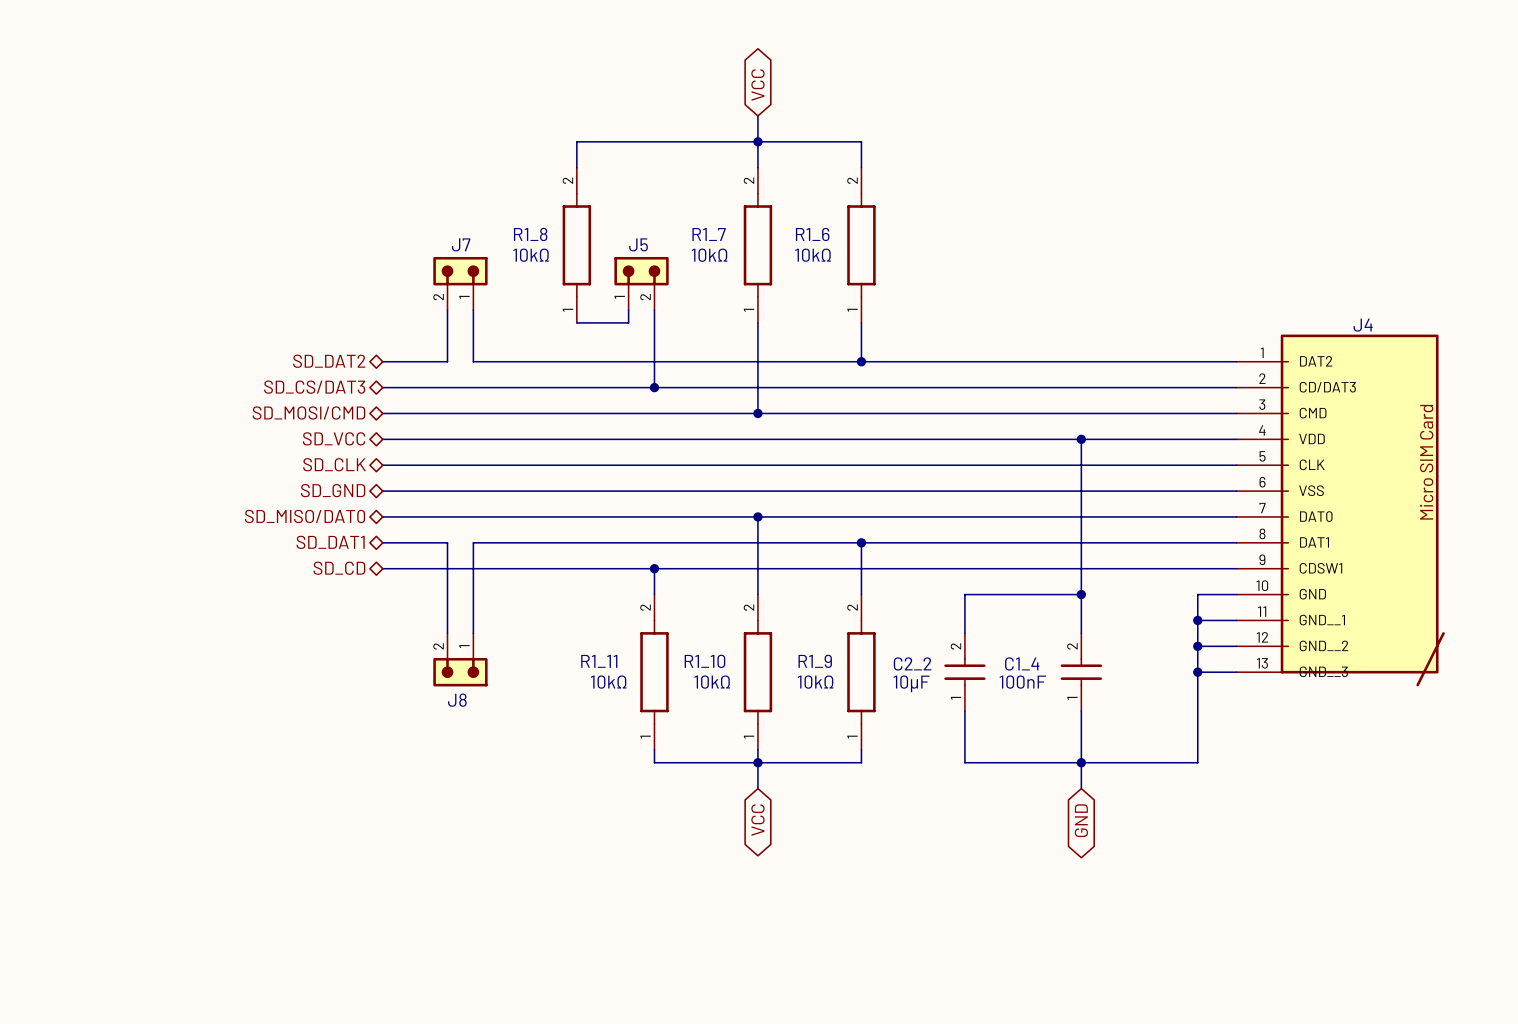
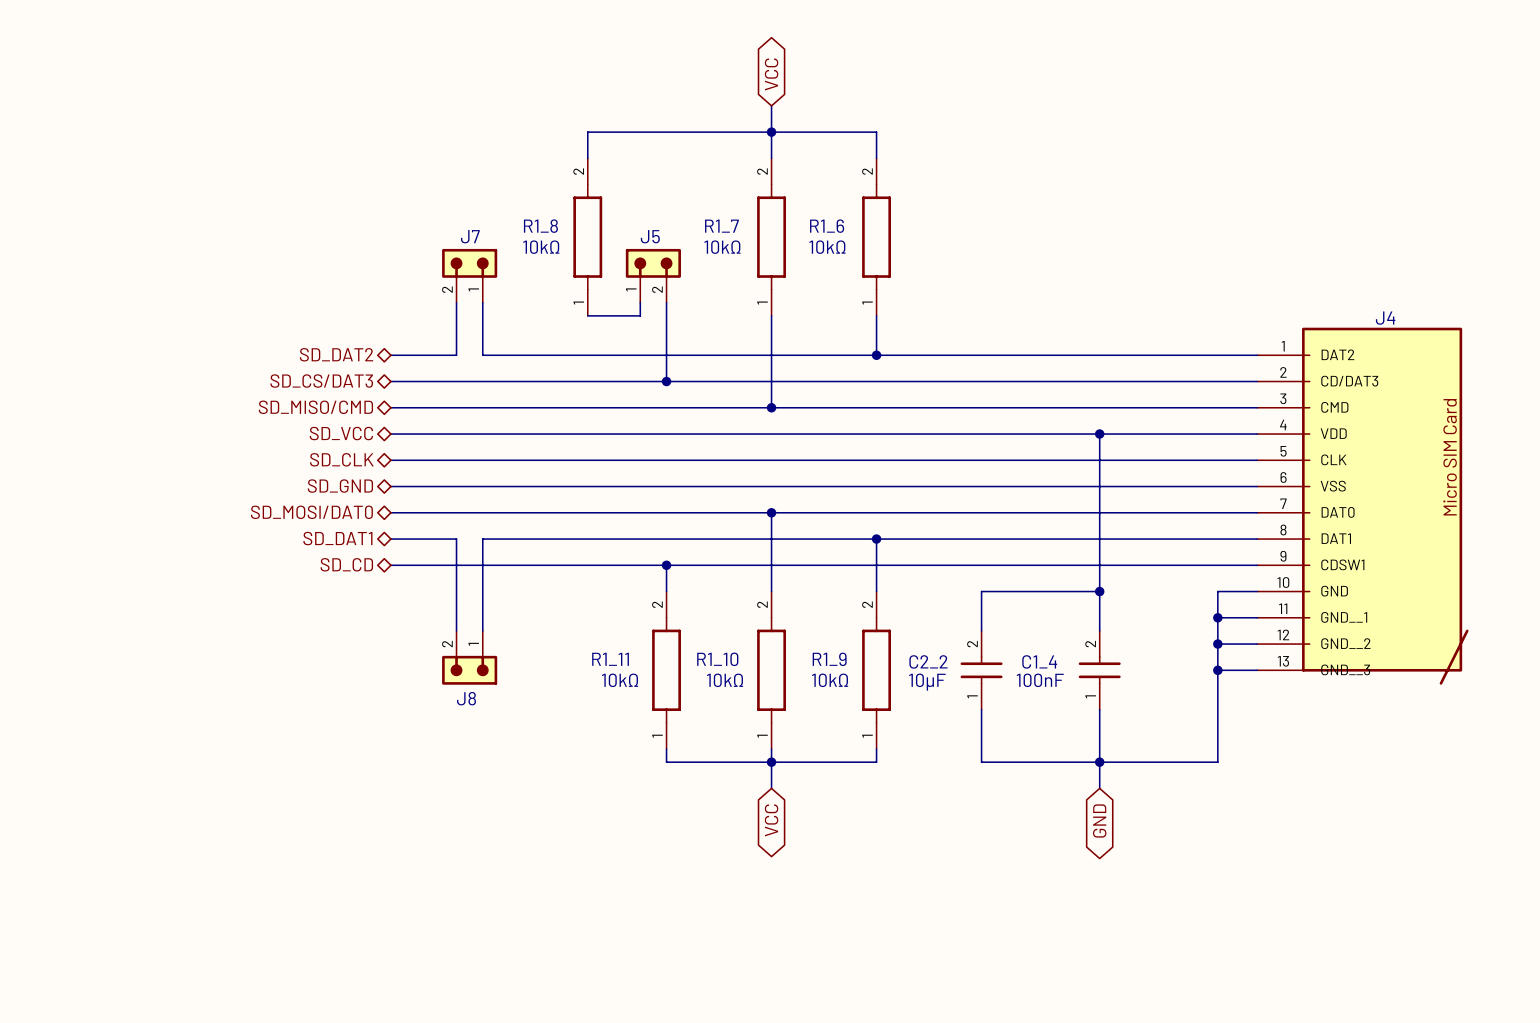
hierarchical label: SD_MOSI/CMD (308, 413) -> SD_MISO/CMD (315, 407)
hierarchical label: SD_MISO/DAT0 (305, 516) -> SD_MOSI/DAT0 (311, 512)

